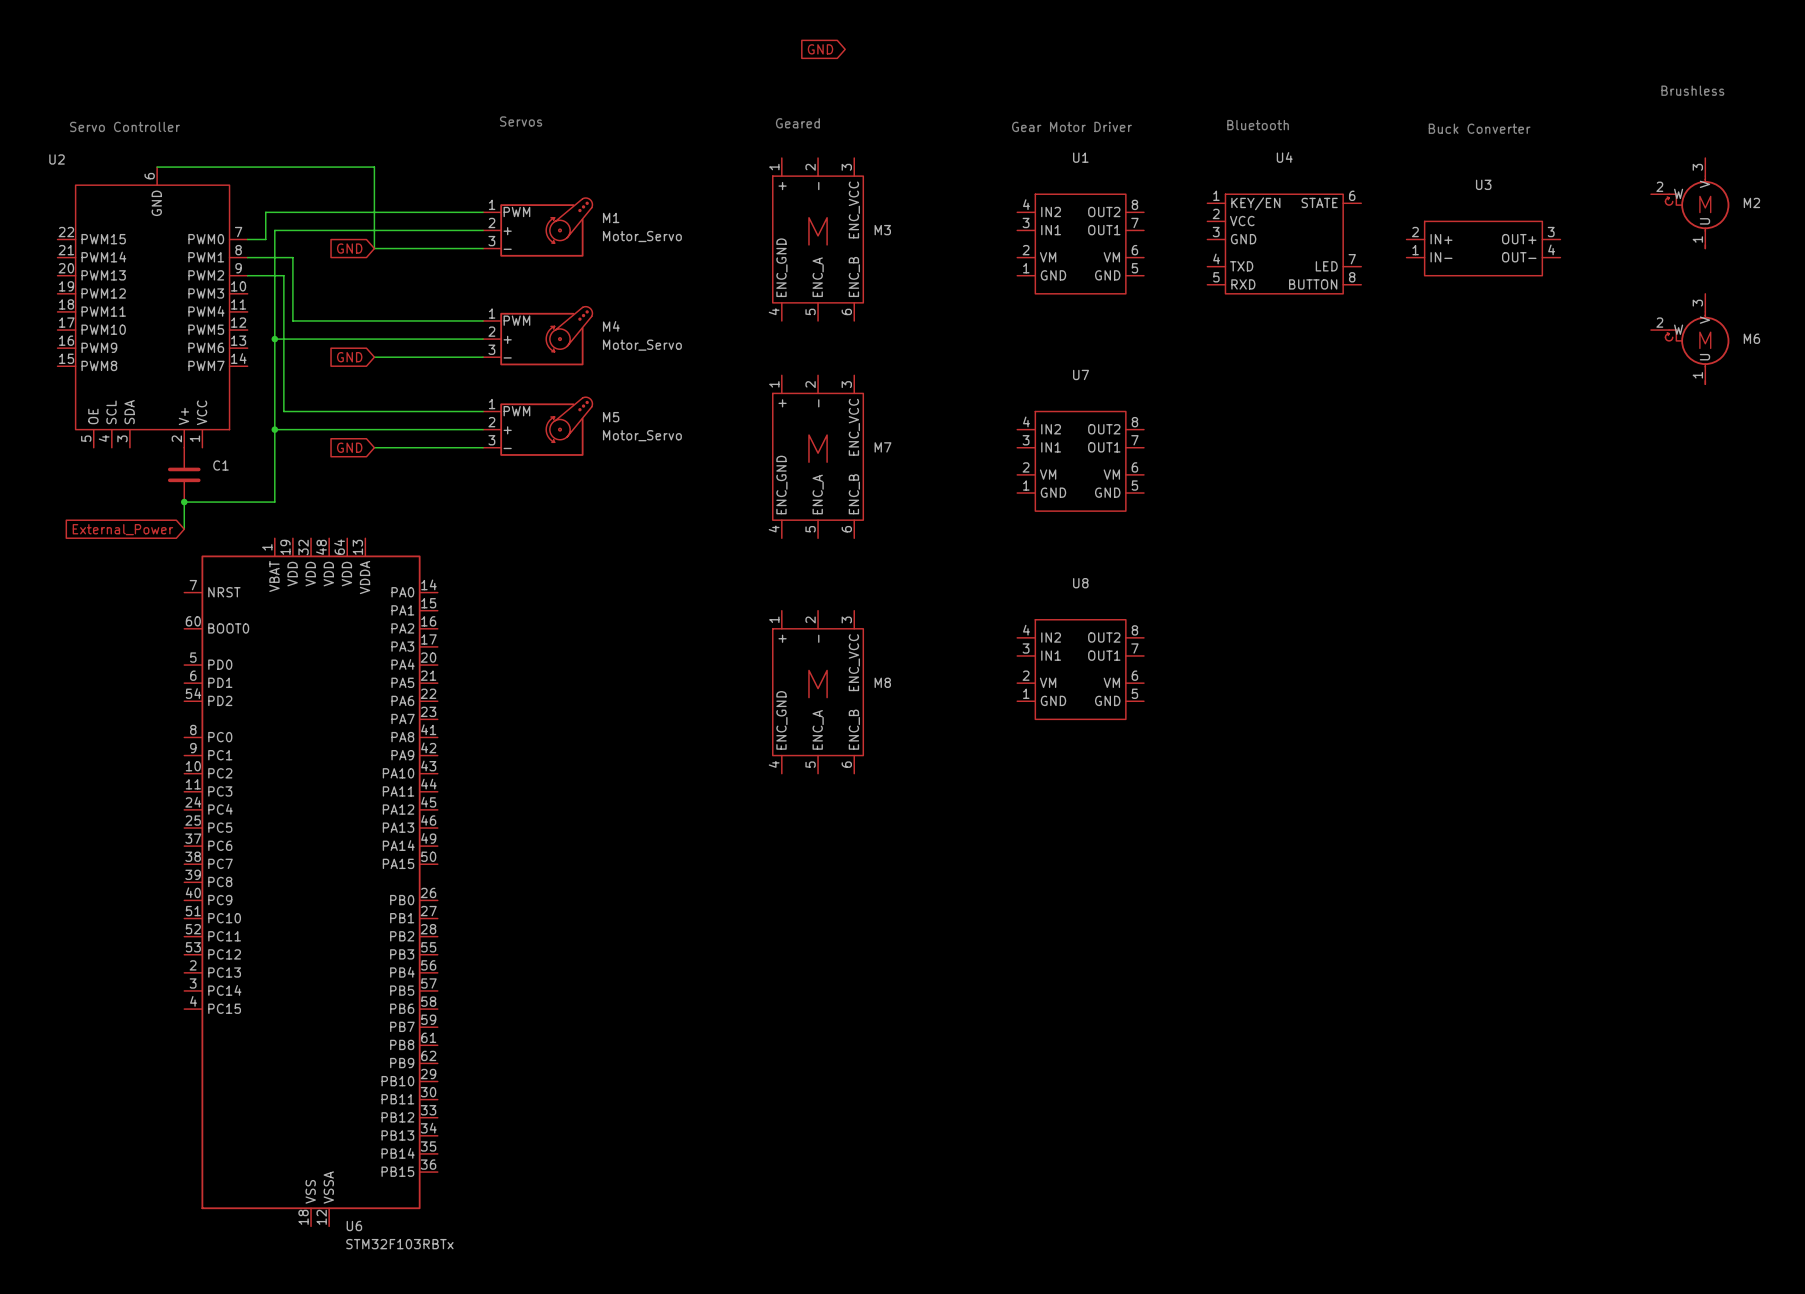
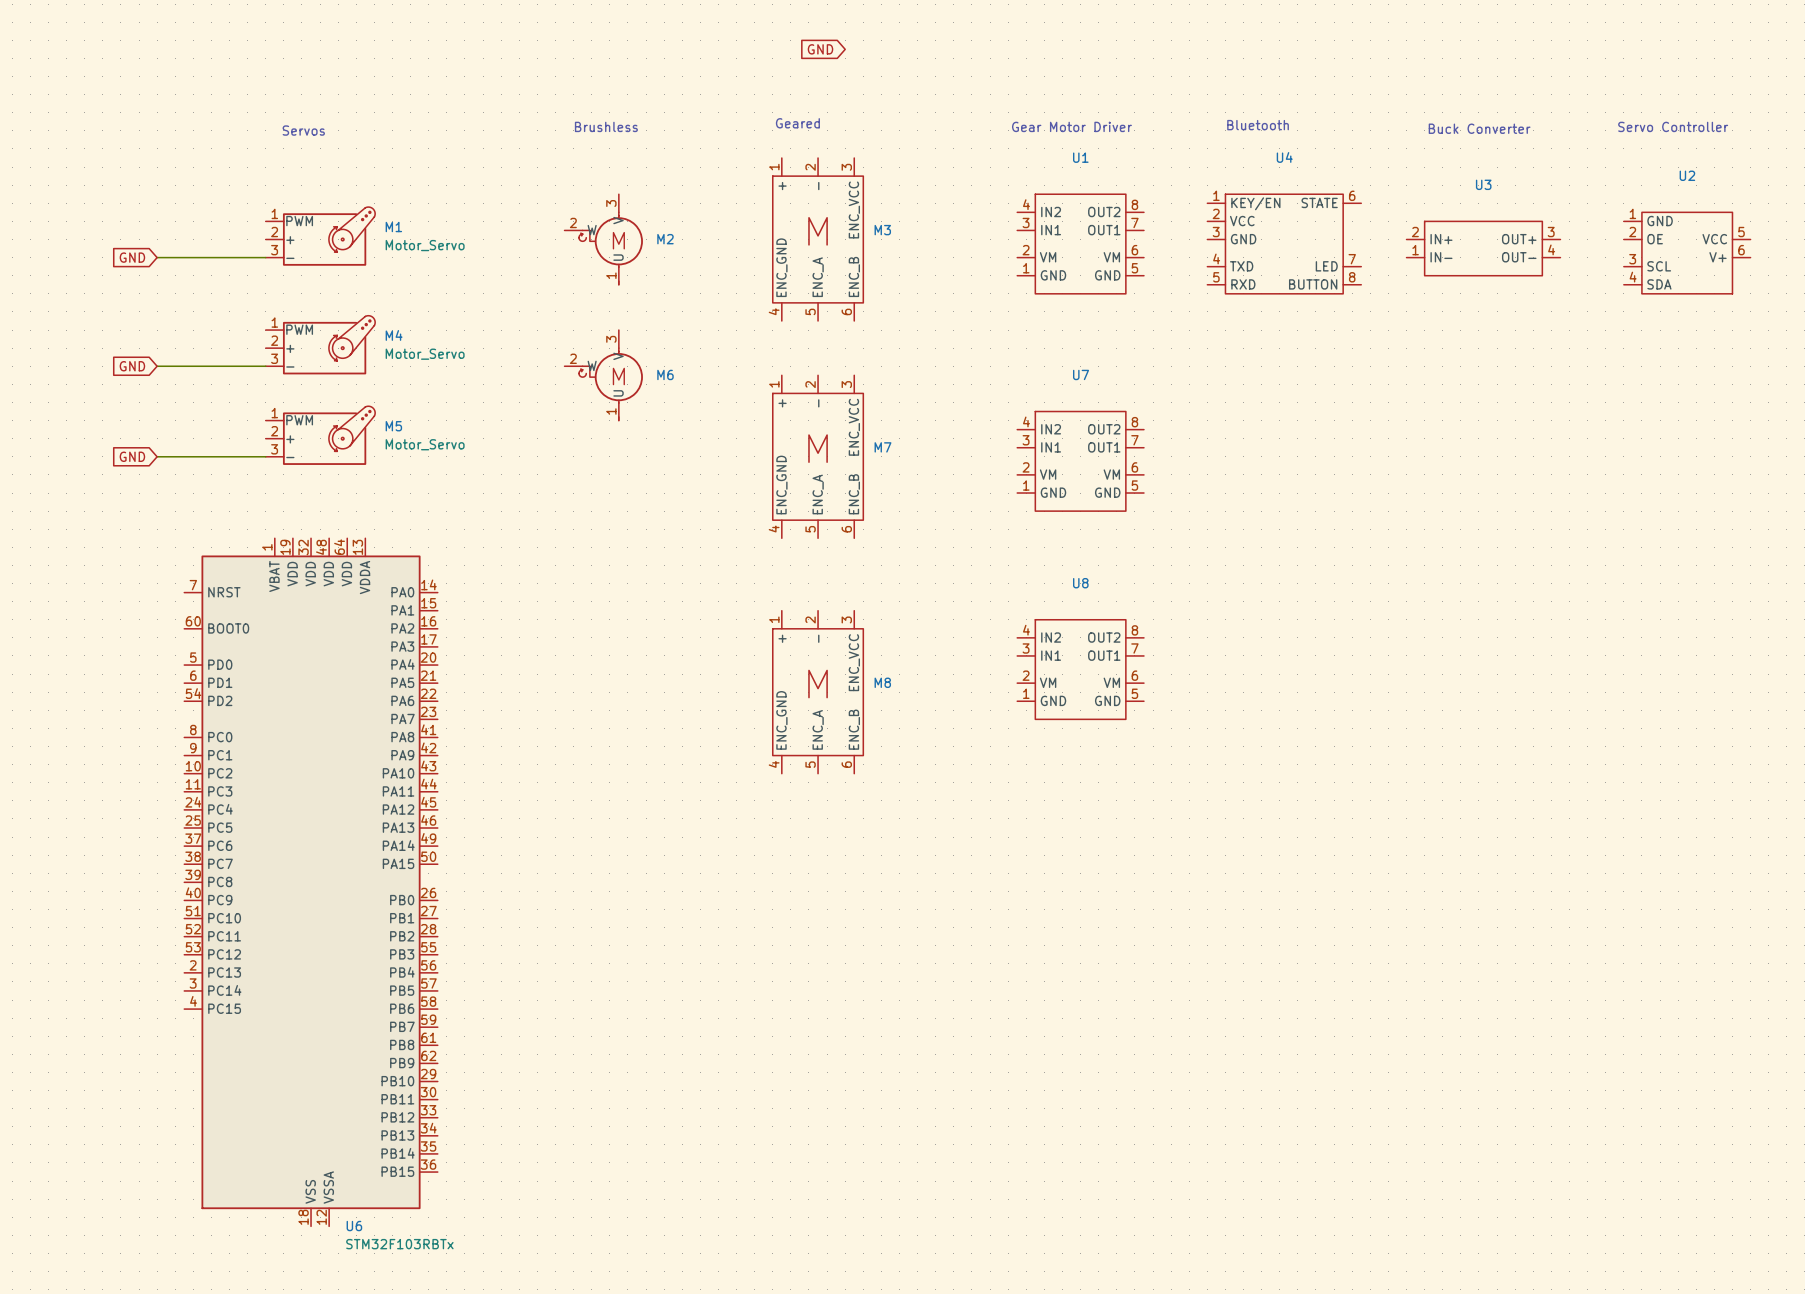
text: Brushless (1692, 90) -> none
text: Servos (521, 121) -> none
text: Servo Controller (124, 126) -> none
text: none -> Brushless (606, 126)
text: none -> Servo Controller (1673, 126)
text: none -> Servos (303, 130)
U2 name position: U2 (57, 159) -> U2 (1687, 175)
U2 symbol: [57, 167, 248, 448] -> [1623, 212, 1751, 294]
wire: (157, 167) (374, 167) (374, 248) (483, 248) -> none
M2 position: (1690, 203) -> (603, 239)
wire: (483, 212) (265, 212) (265, 239) (247, 239) -> none
M1 position: (537, 227) -> (320, 236)
wire: (483, 230) (274, 230) (274, 502) (184, 502) (184, 529) -> none
global label: GND (349, 248) -> none
global label: none -> GND (132, 257)
wire: none -> (157, 257) (247, 257)
wire: (265, 257) (292, 257) (292, 320) (483, 320) -> none
wire: (247, 275) (283, 275) (283, 411) (483, 411) -> none
M4 position: (537, 336) -> (320, 345)
wire: (274, 339) (483, 339) -> none
junction: (274, 339) -> none
M6 position: (1690, 339) -> (603, 375)
global label: GND (349, 357) -> none
wire: (374, 357) (483, 357) -> none
global label: none -> GND (132, 366)
wire: none -> (157, 366) (265, 366)
M5 position: (537, 426) -> (320, 435)
wire: (274, 429) (483, 429) -> none
junction: (274, 429) -> none
global label: GND (349, 447) -> none
wire: (374, 447) (483, 447) -> none
global label: none -> GND (132, 456)
wire: none -> (157, 456) (265, 456)
C1: (184, 474) -> none
junction: (184, 502) -> none
global label: External_Power (122, 529) -> none

